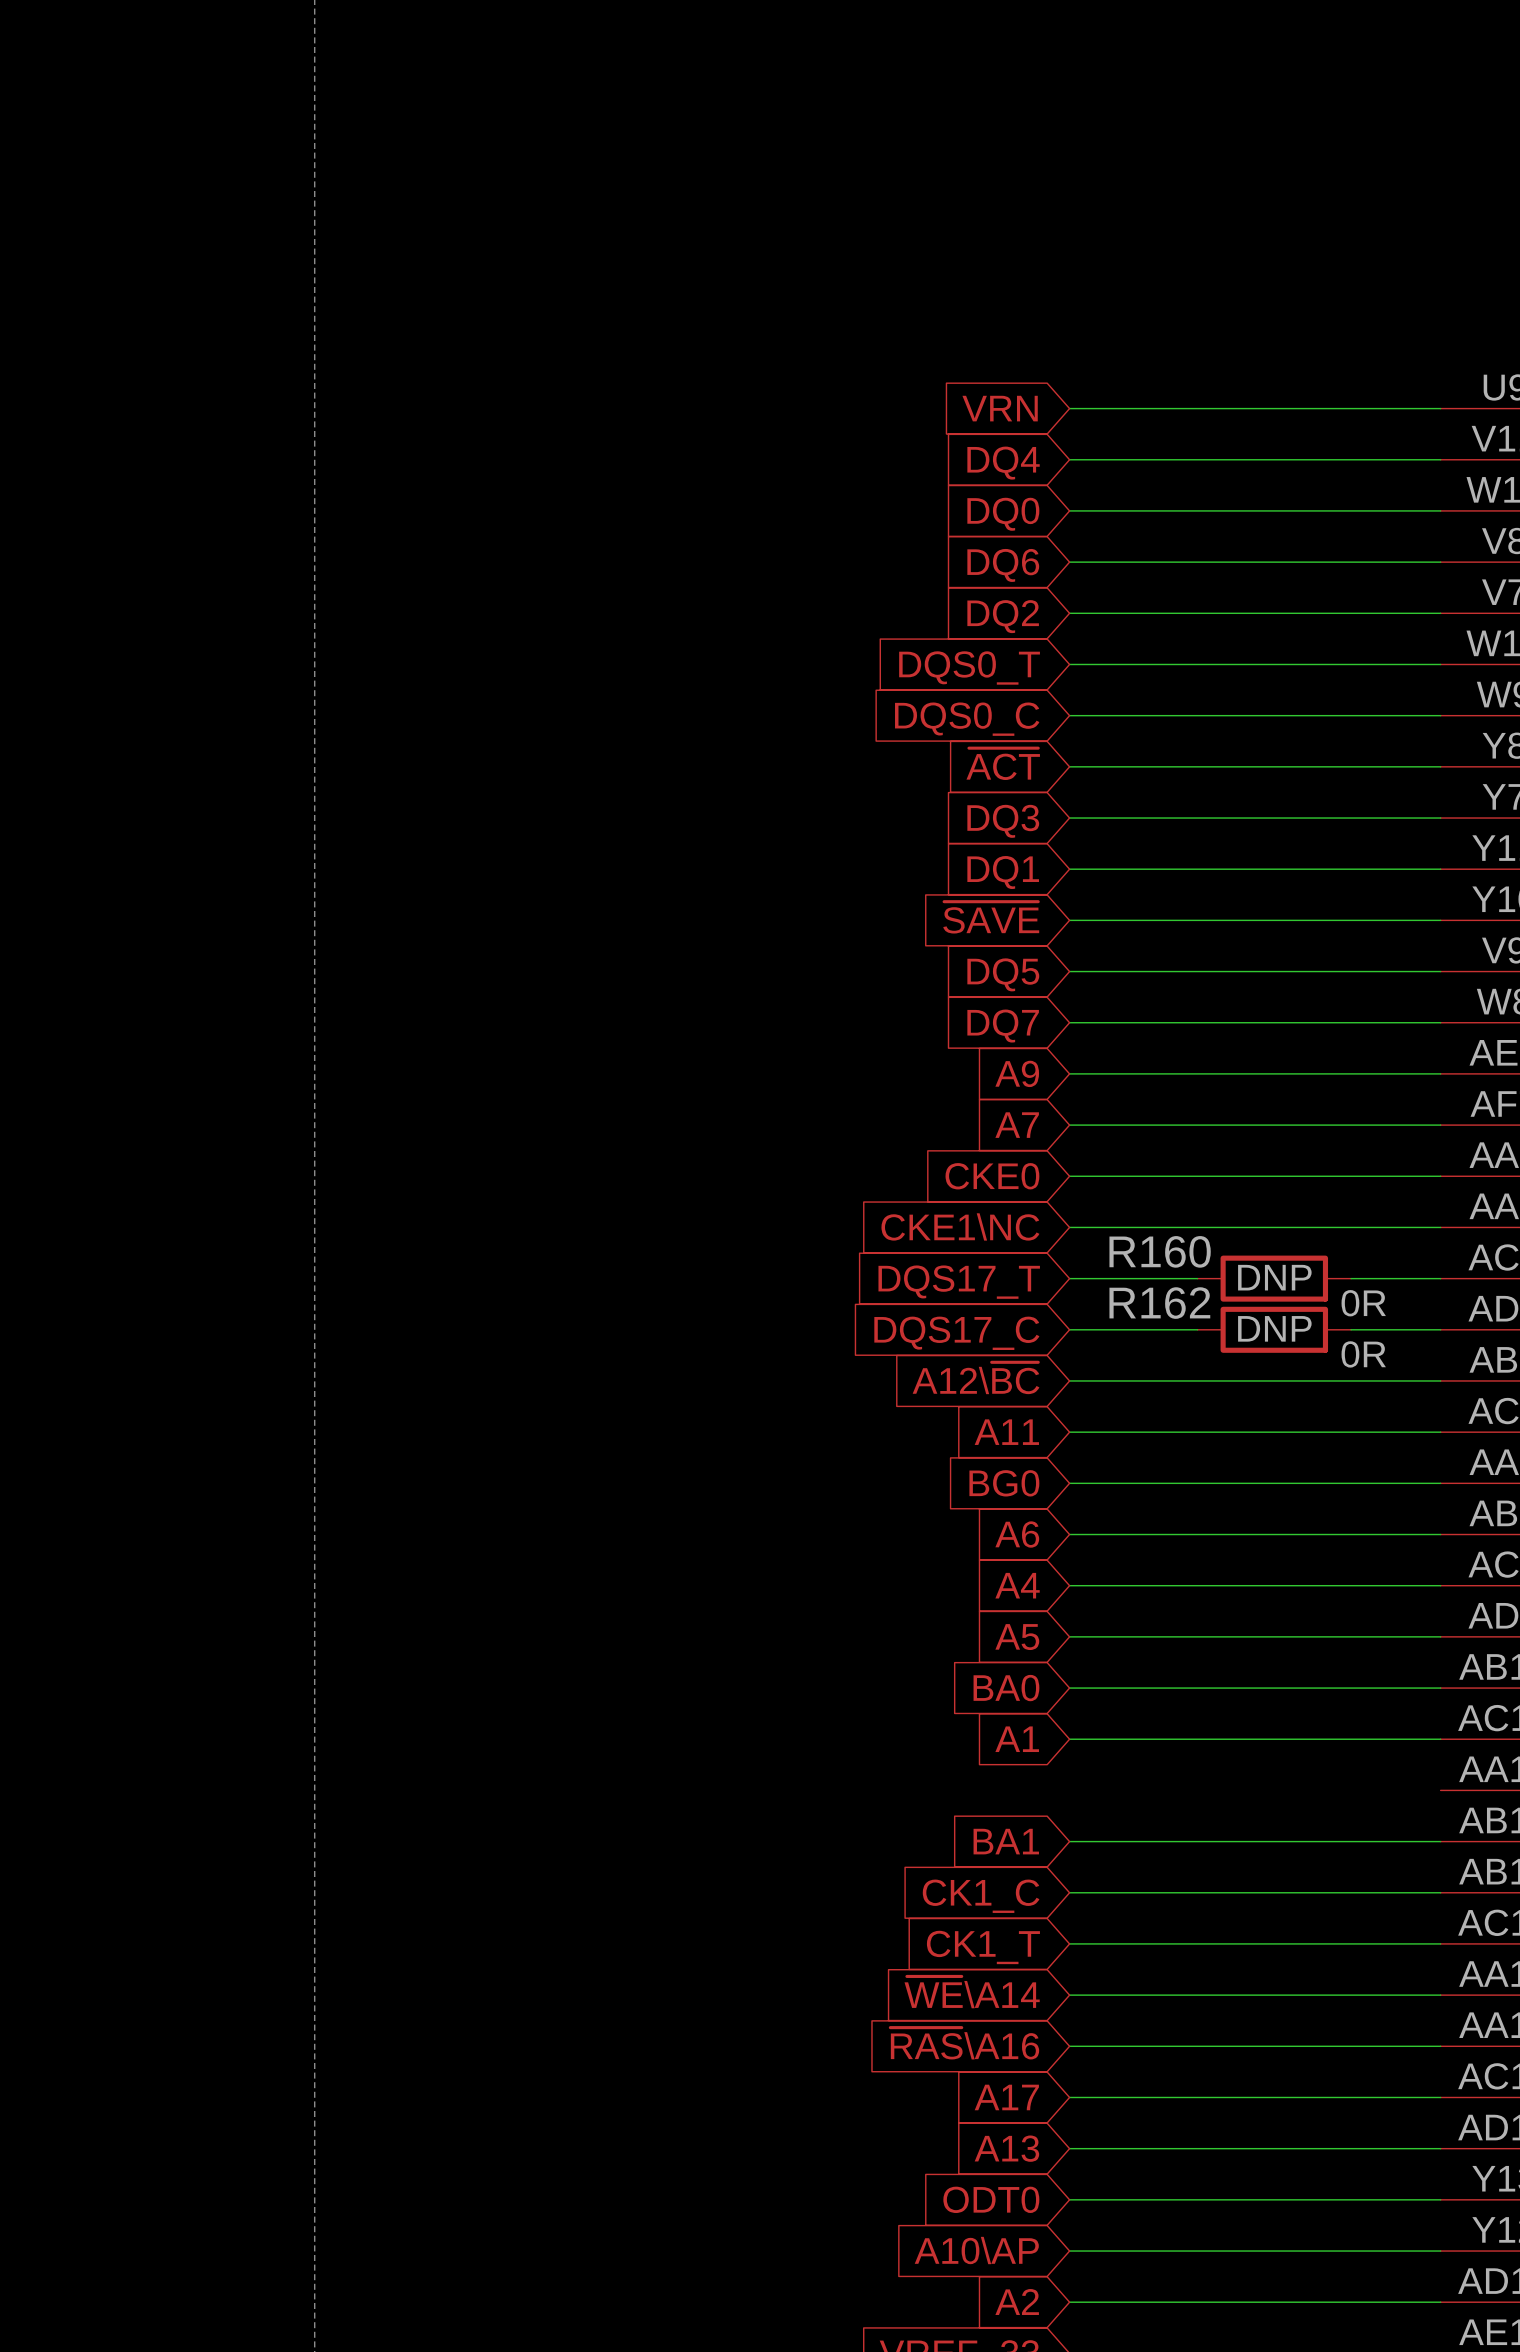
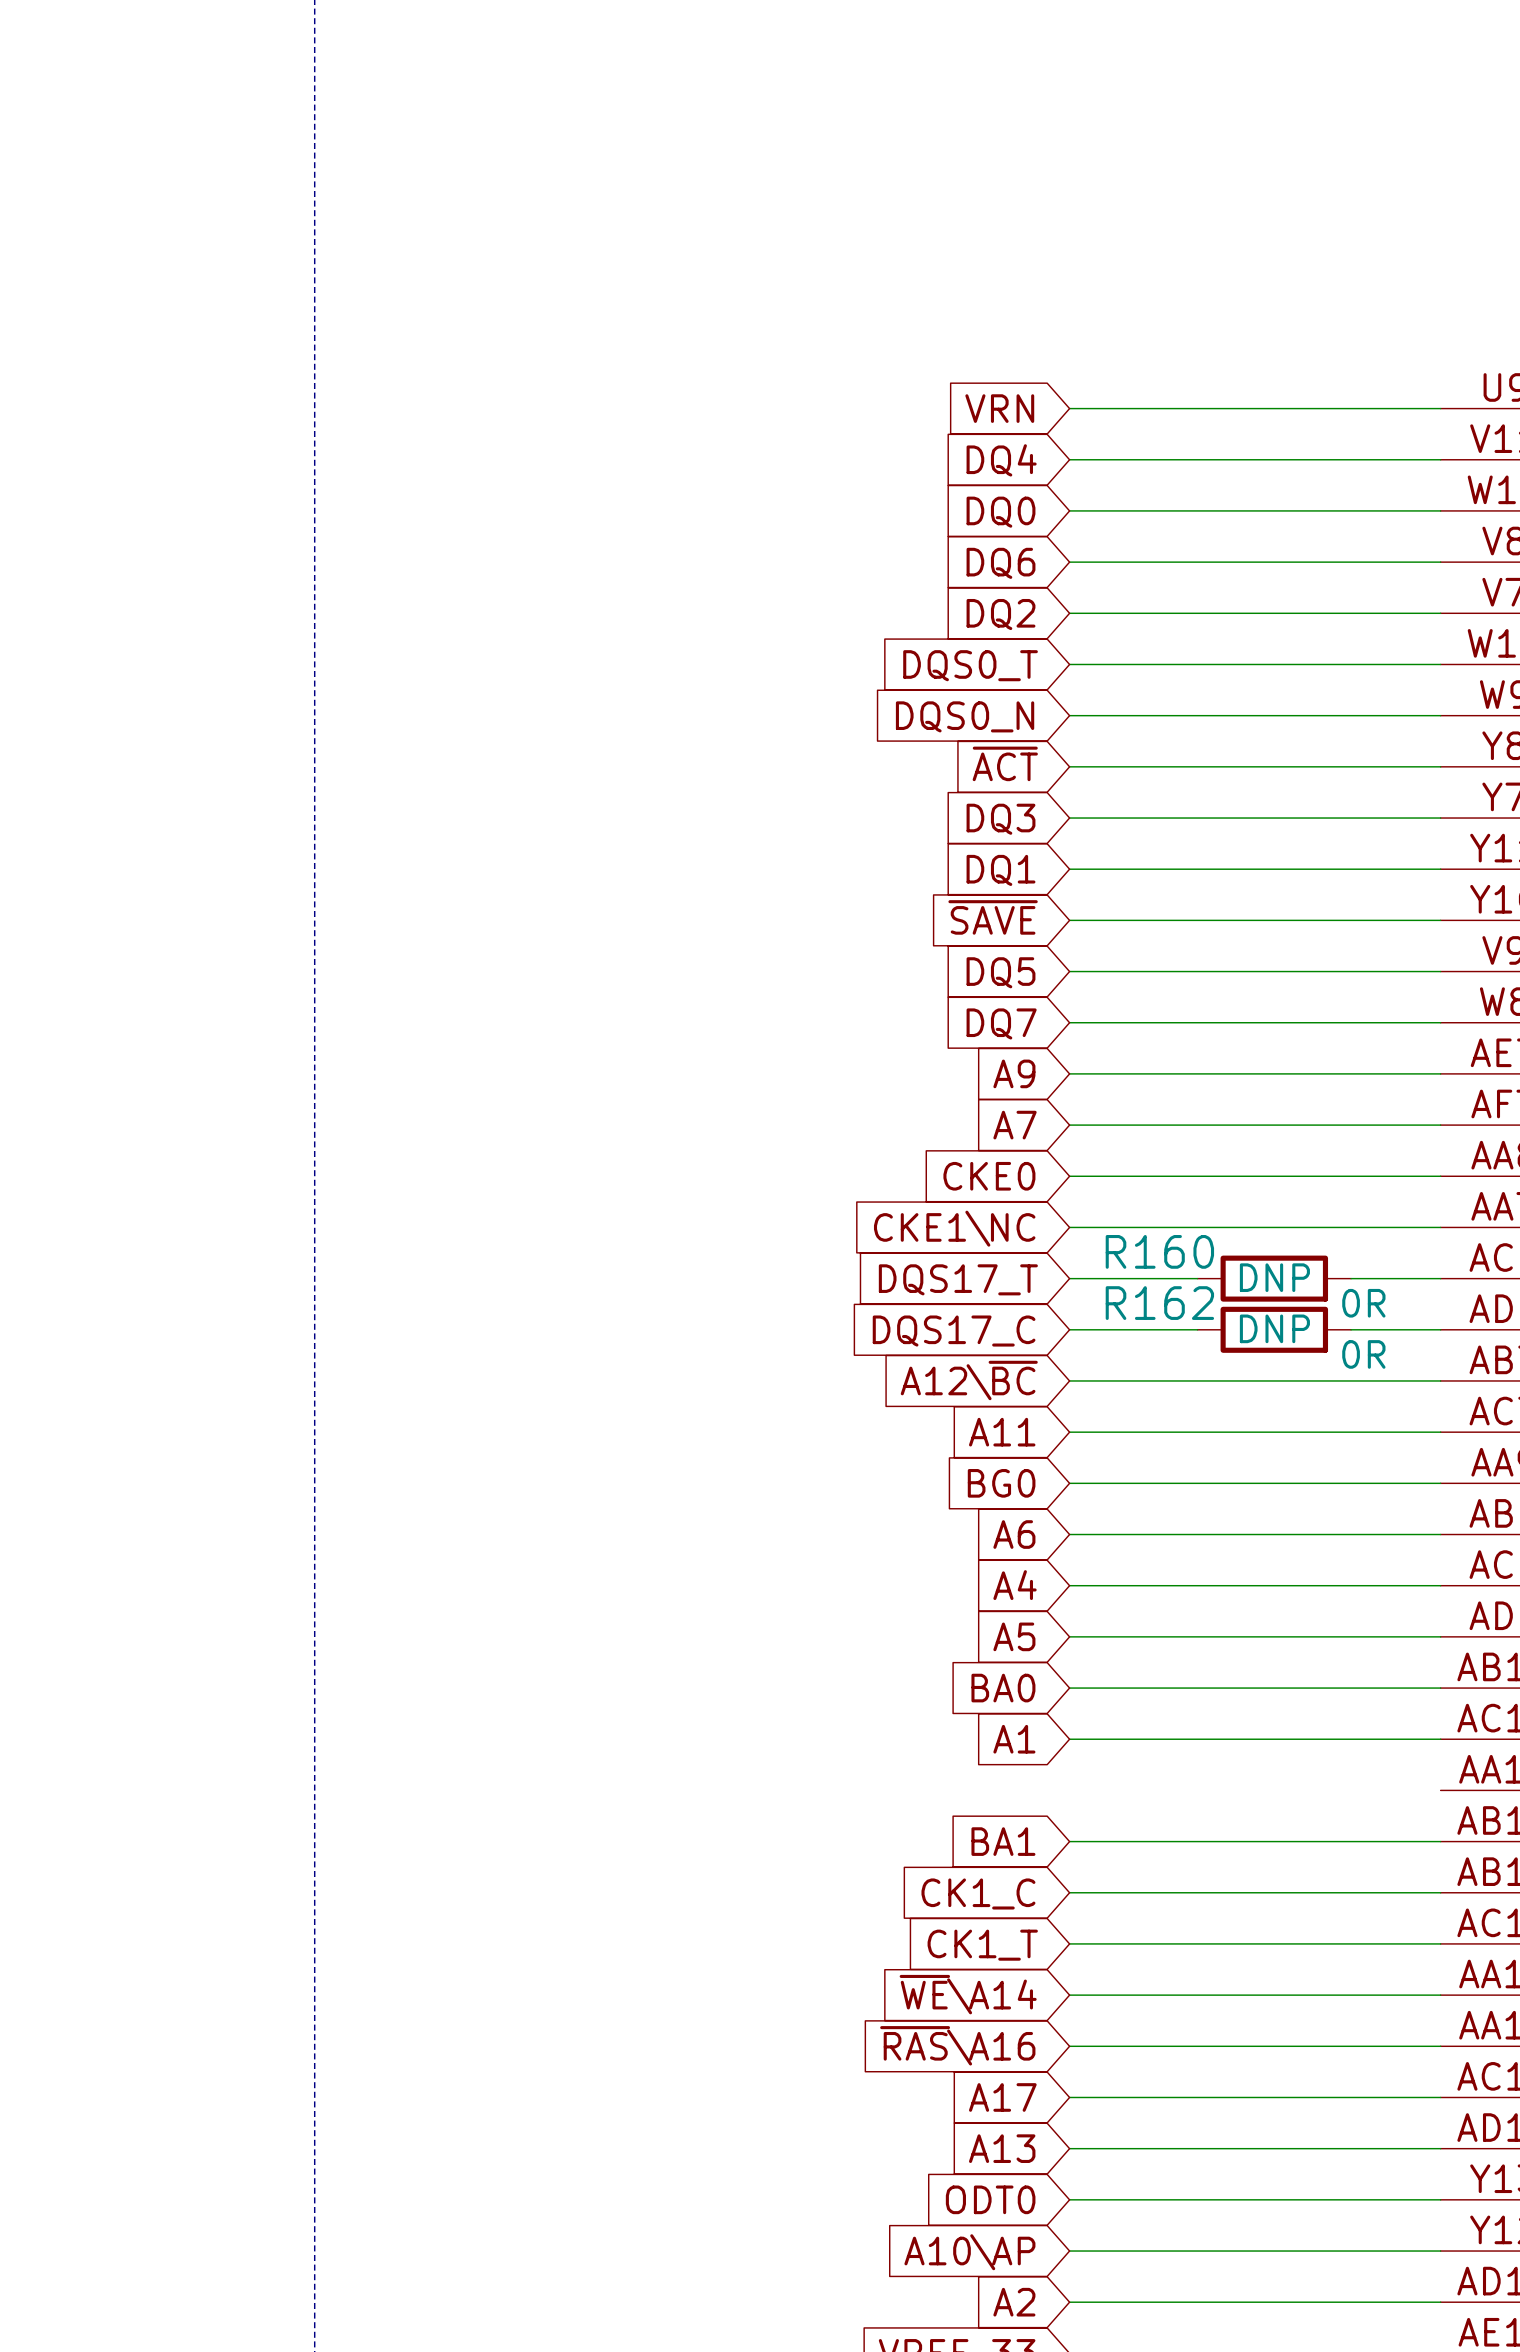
global label: DQS0_C (967, 719) -> DQS0_N (965, 716)

